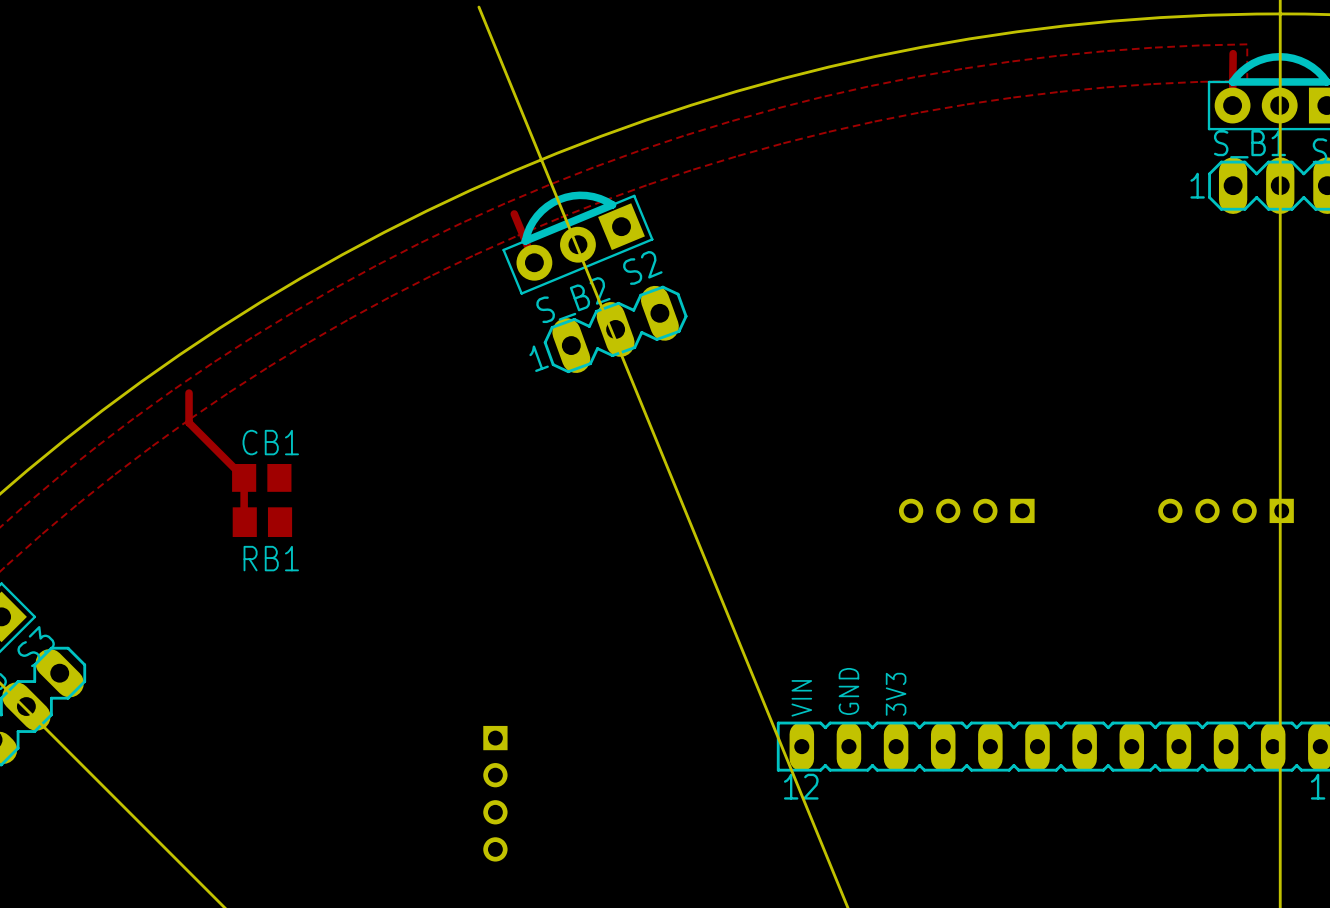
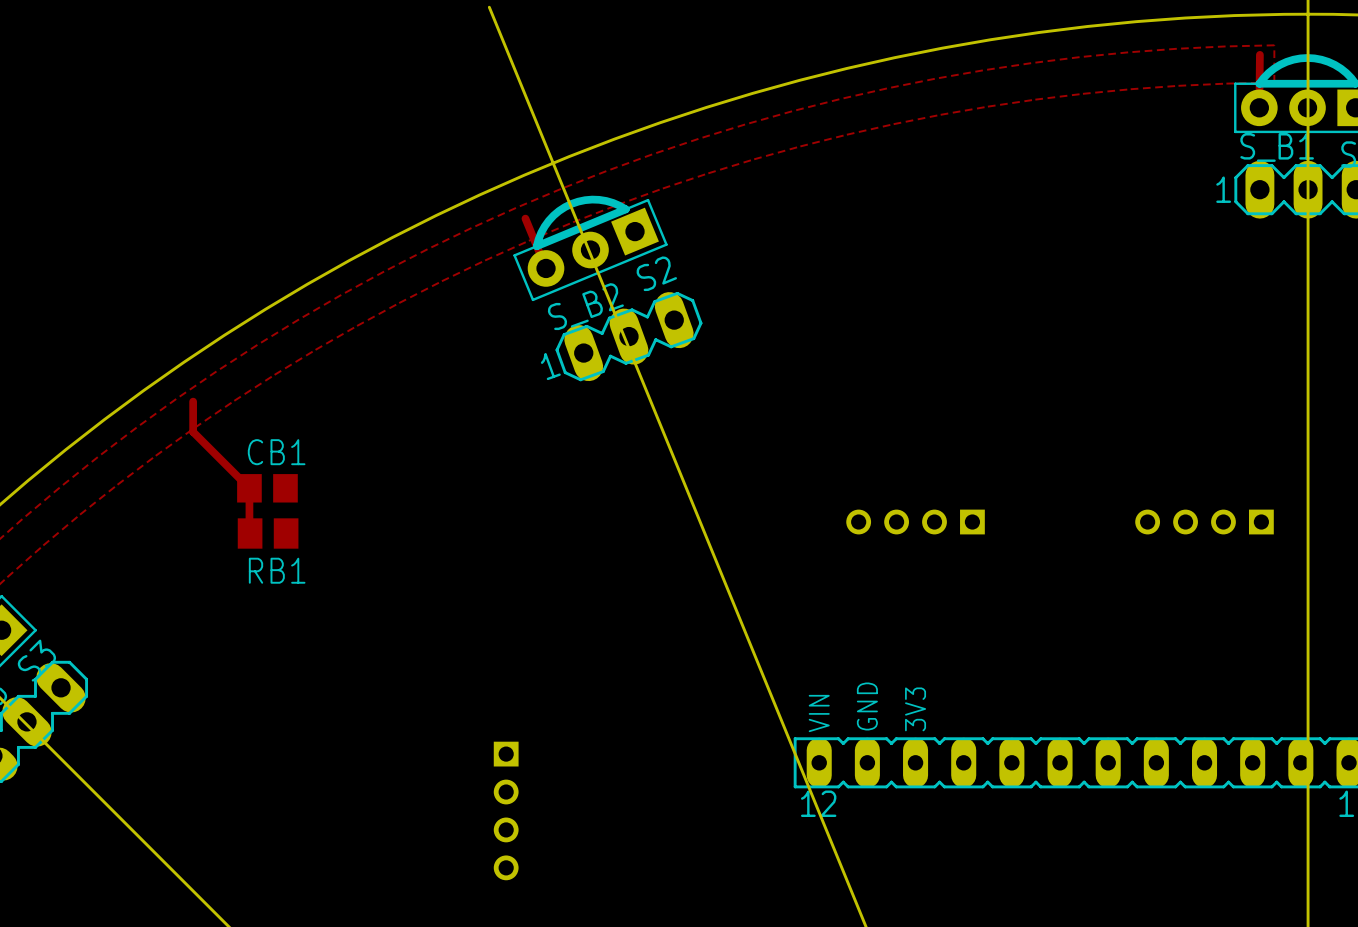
part position: (966, 510) -> (915, 522)
part position: (1226, 510) -> (1204, 522)

